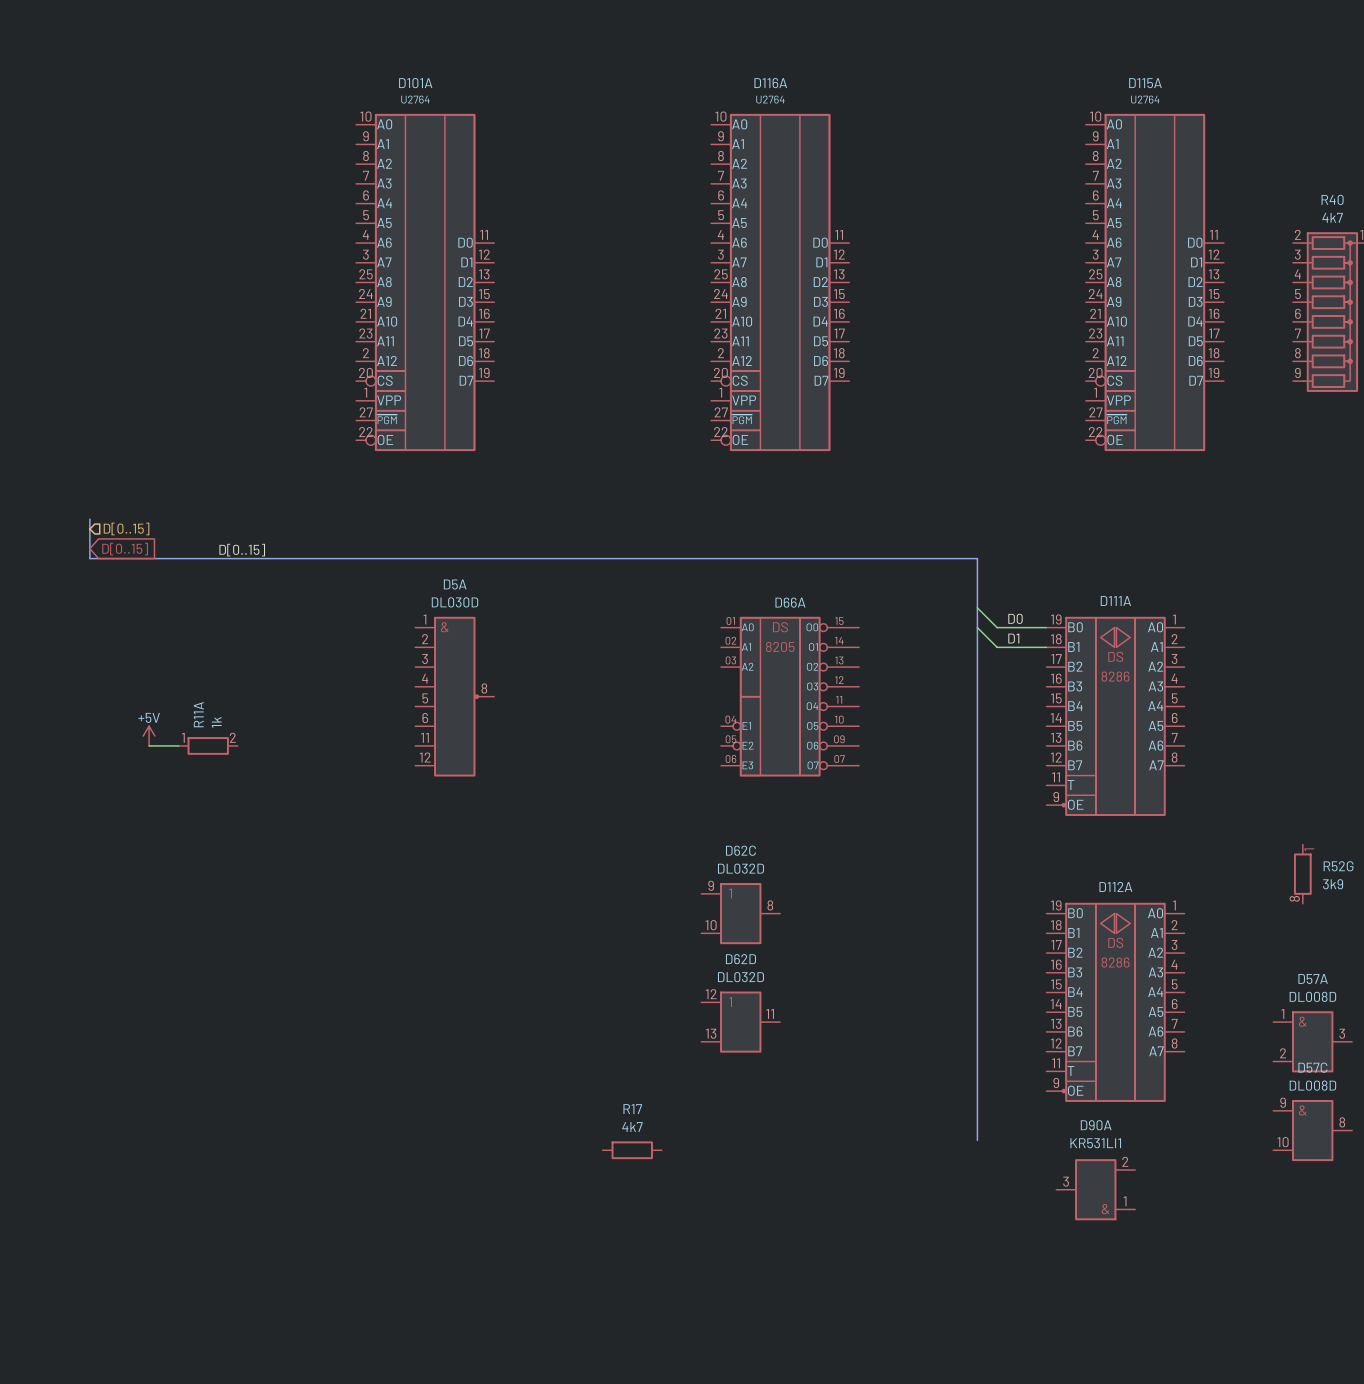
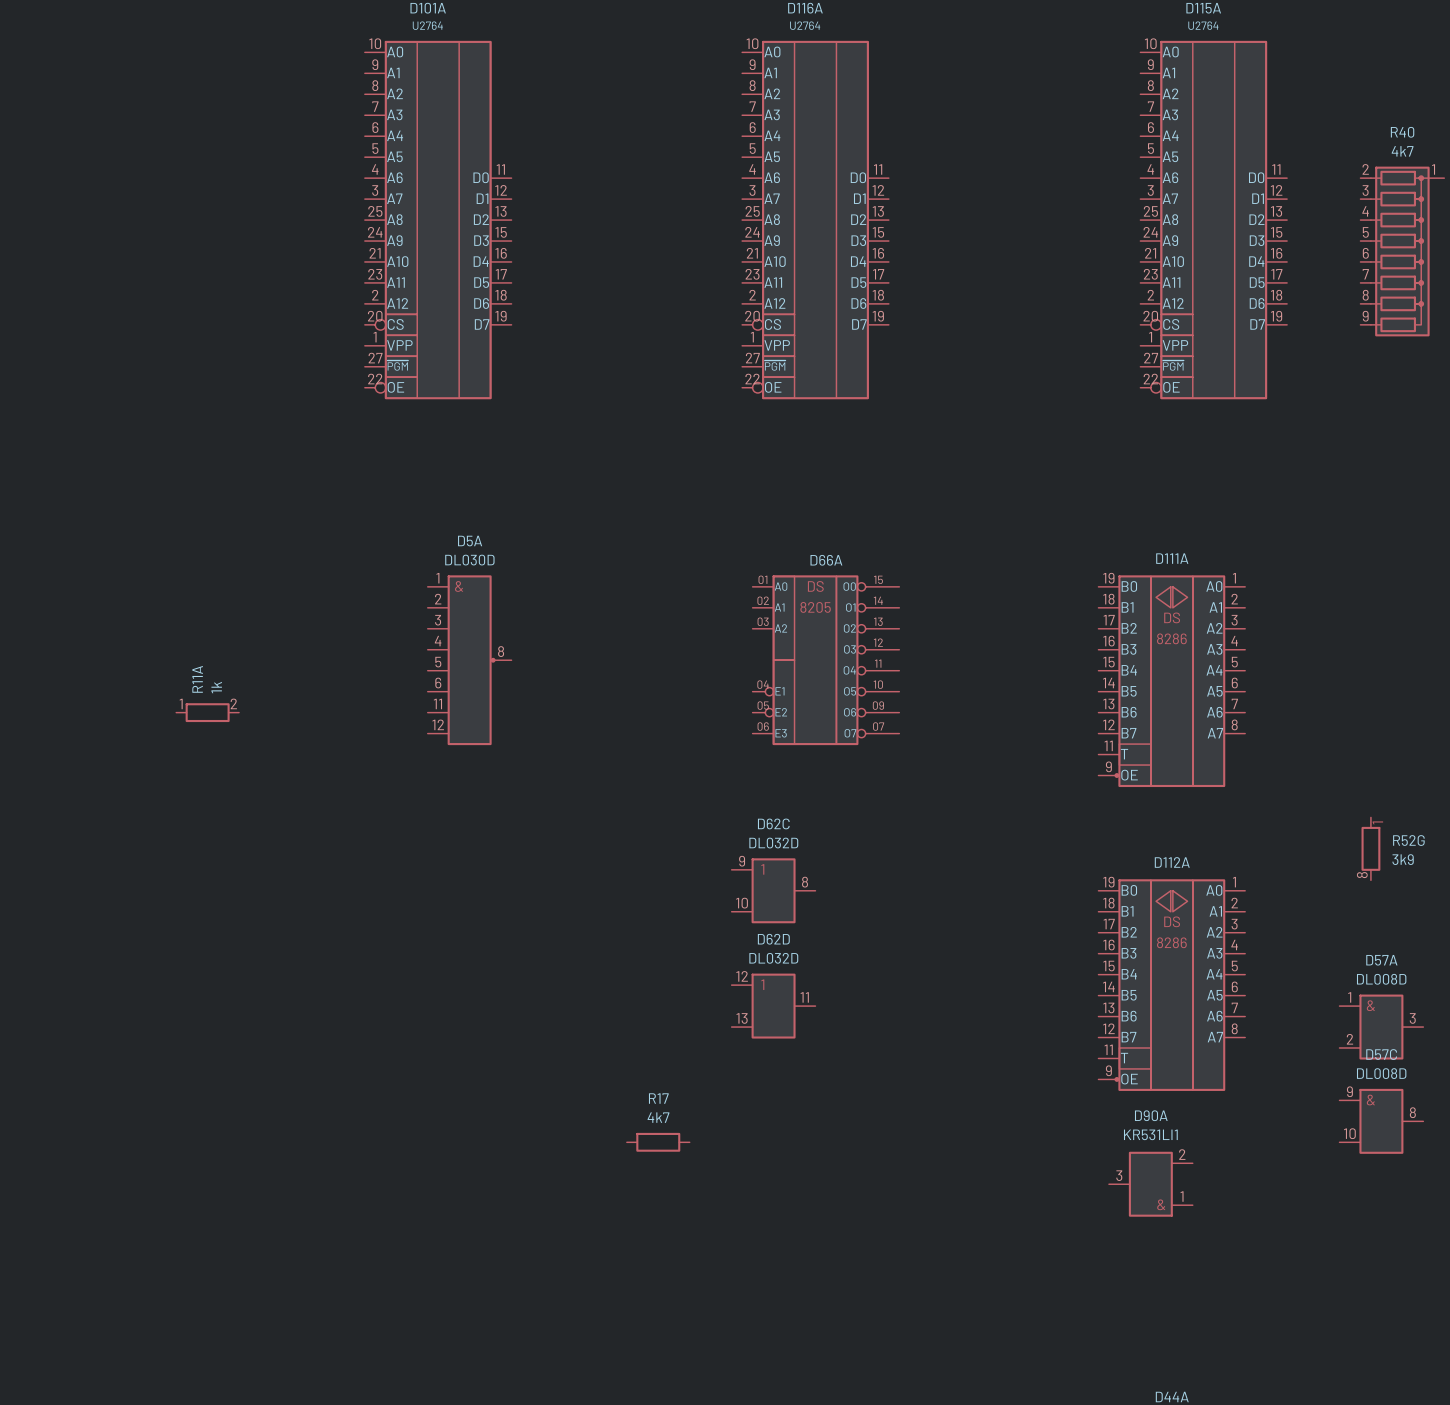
bus: (89, 519) (89, 558) (977, 558) (977, 1140) -> none
hierarchical label: D[0..15] (126, 528) -> none
global label: D[0..15] (125, 549) -> none
label: D[0..15] (242, 550) -> none
wire: (977, 607) (997, 627) (1046, 627) -> none
label: D0 (1015, 618) -> none
wire: (977, 627) (997, 647) (1046, 647) -> none
label: D1 (1013, 638) -> none
power symbol: +5V (149, 736) -> none
wire: (149, 745) (178, 745) -> none

